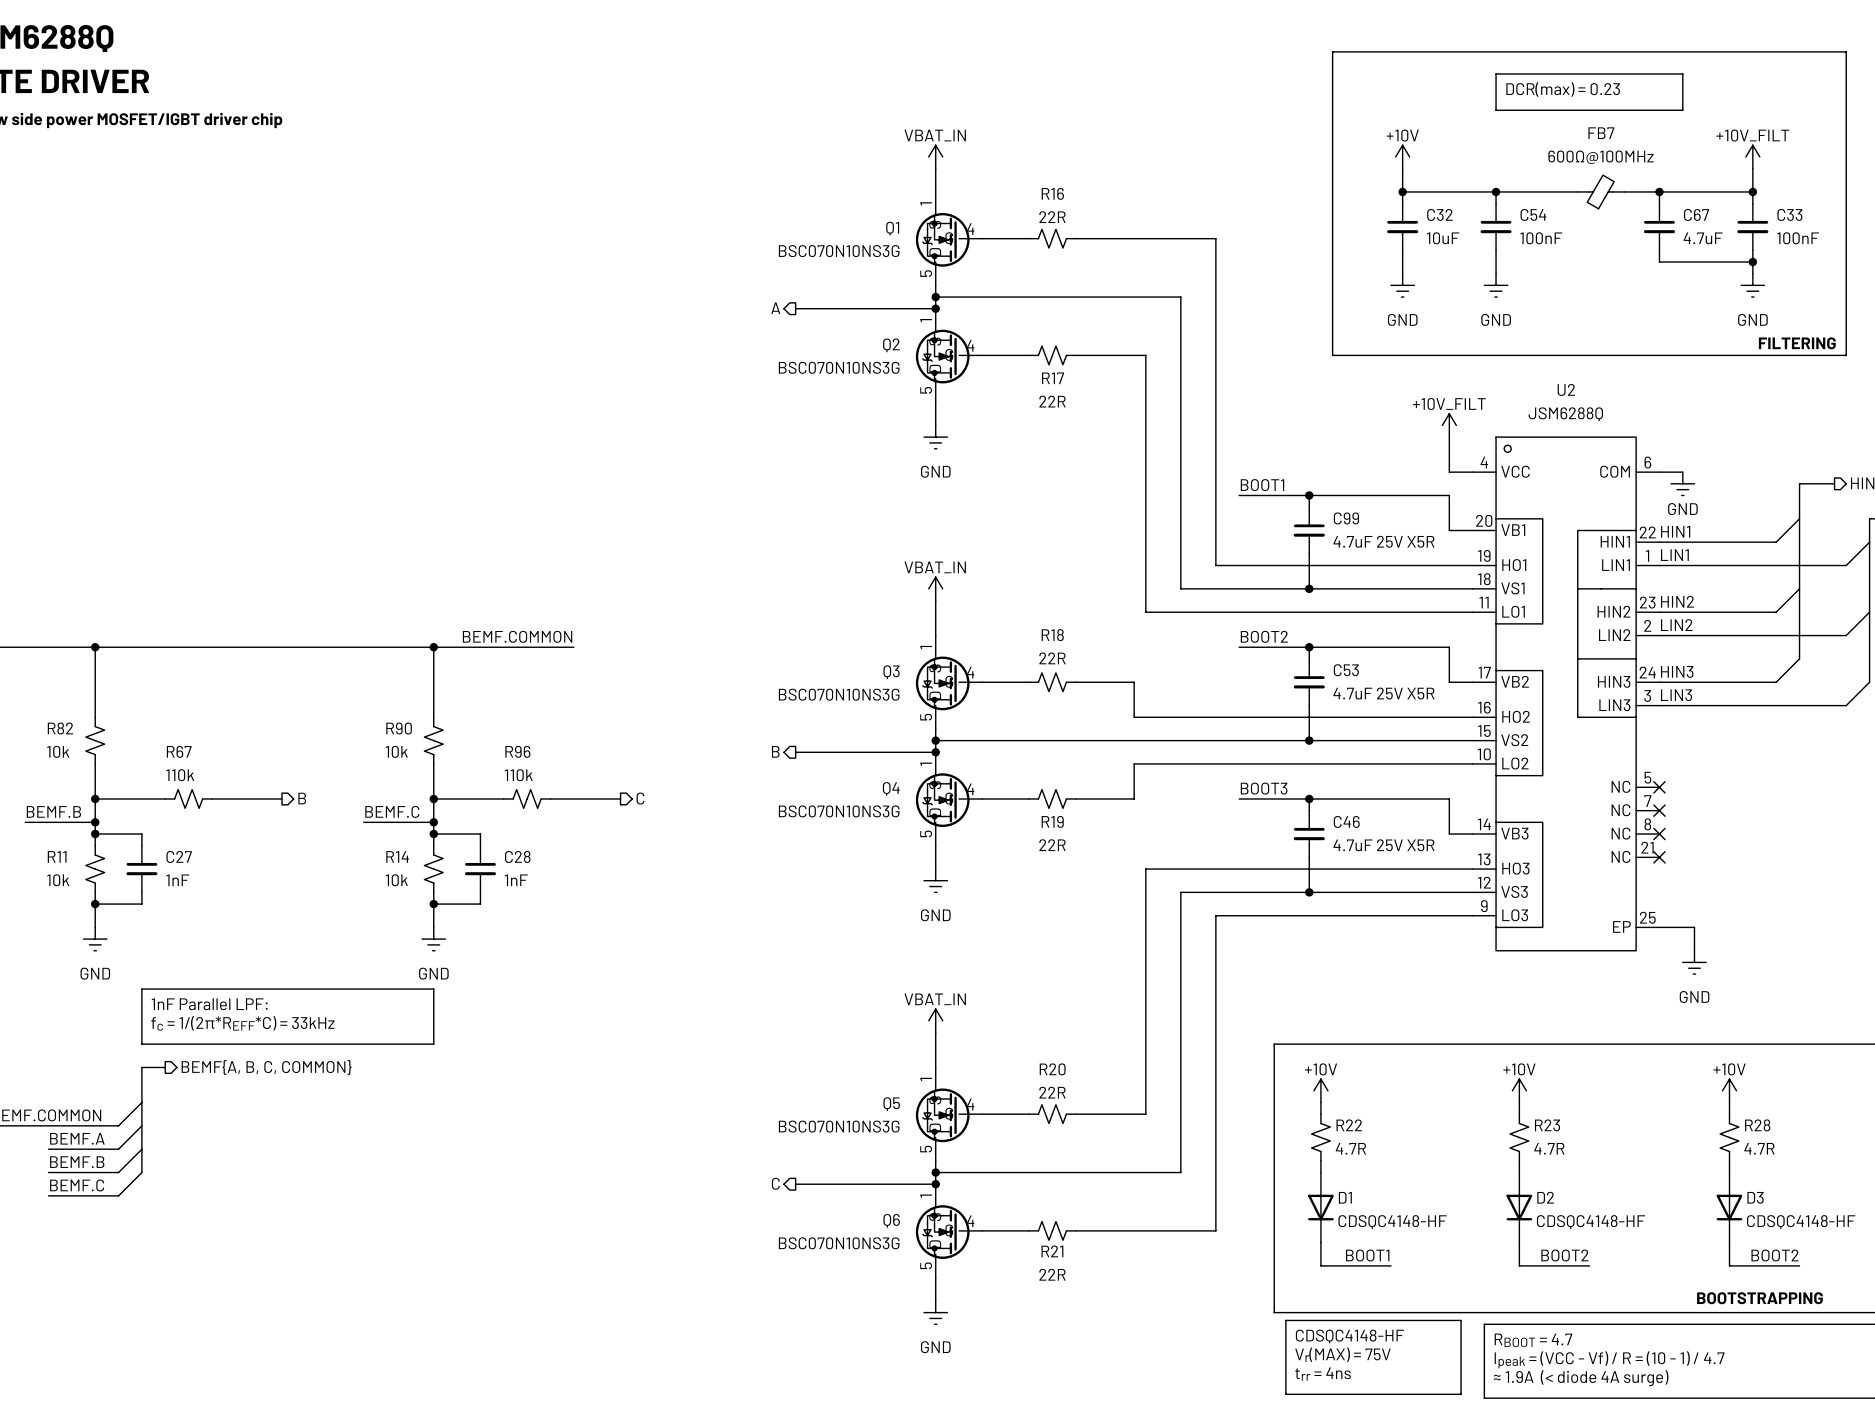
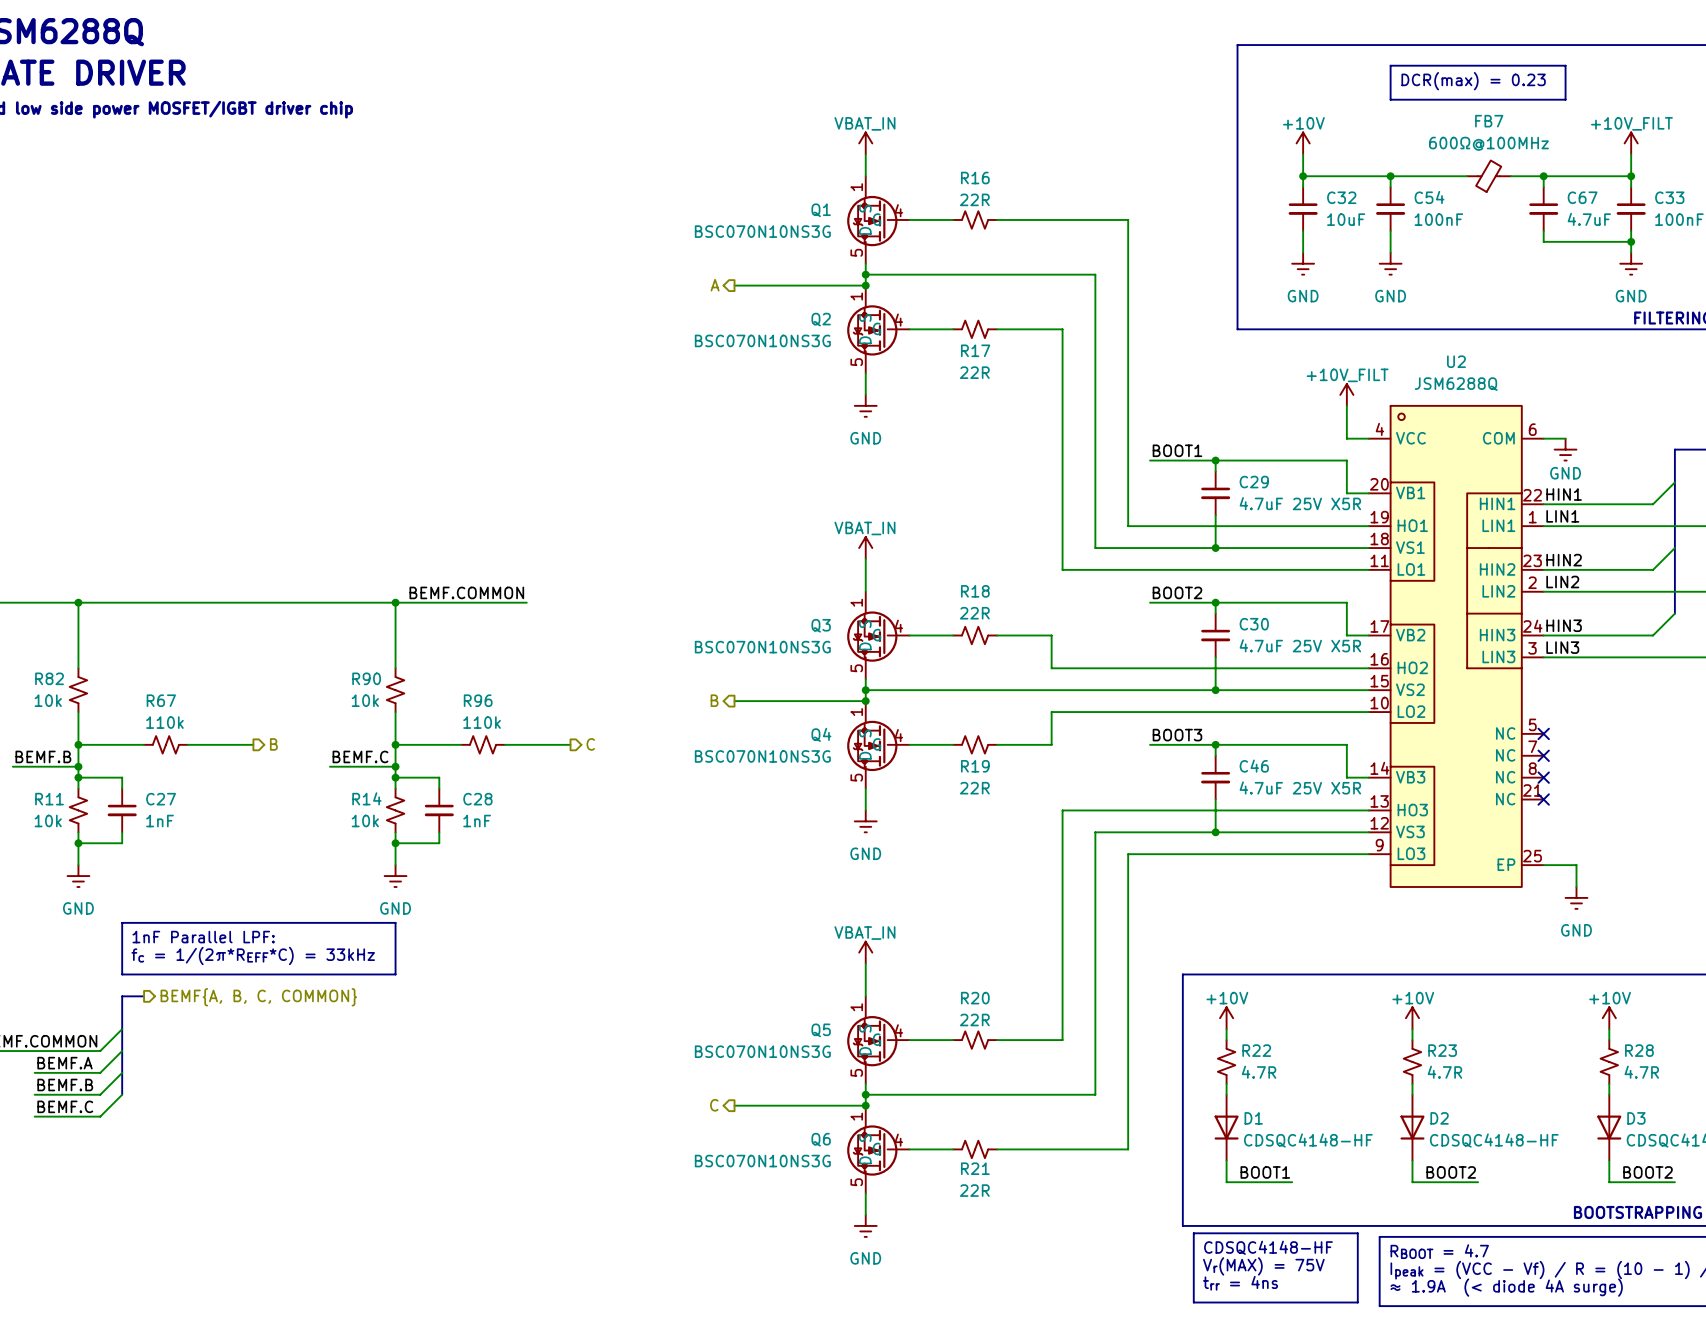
C99 name: C99 (1346, 518) -> C29 (1254, 482)
C53 name: C53 (1346, 670) -> C30 (1254, 624)

